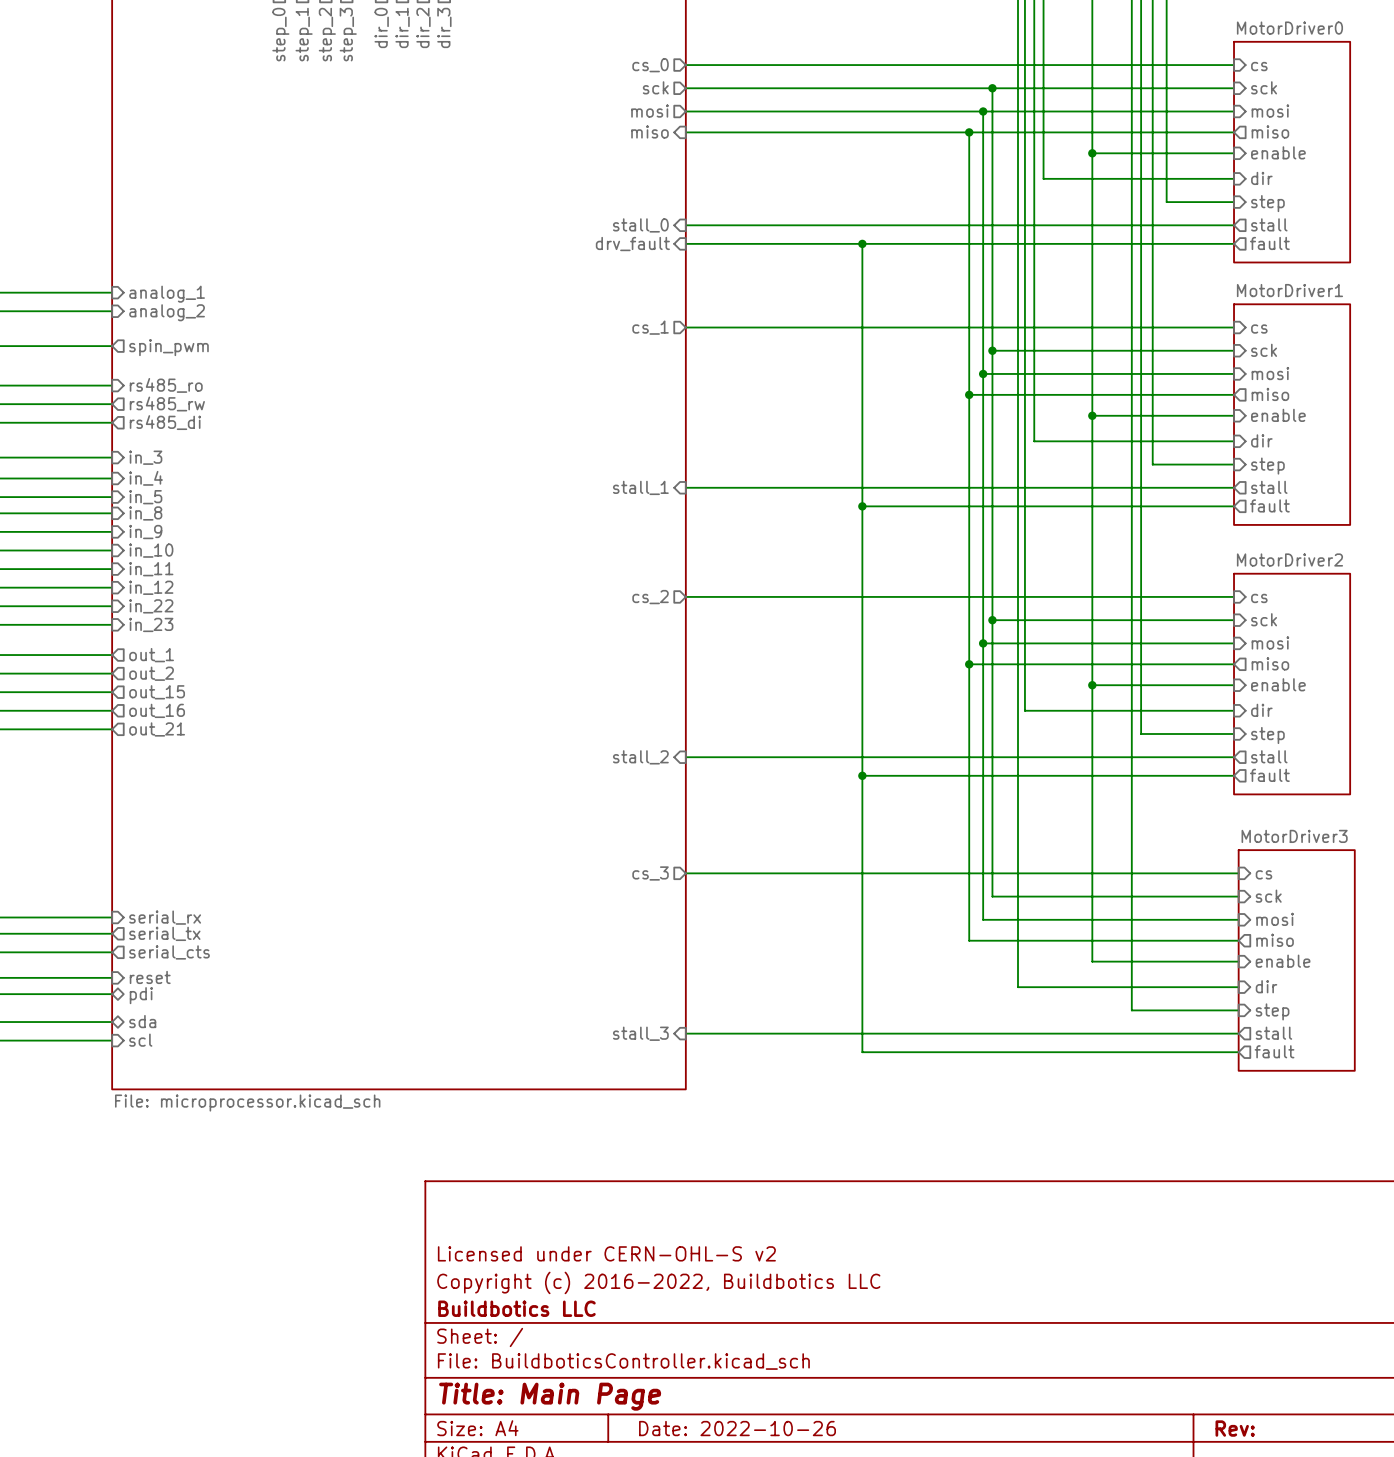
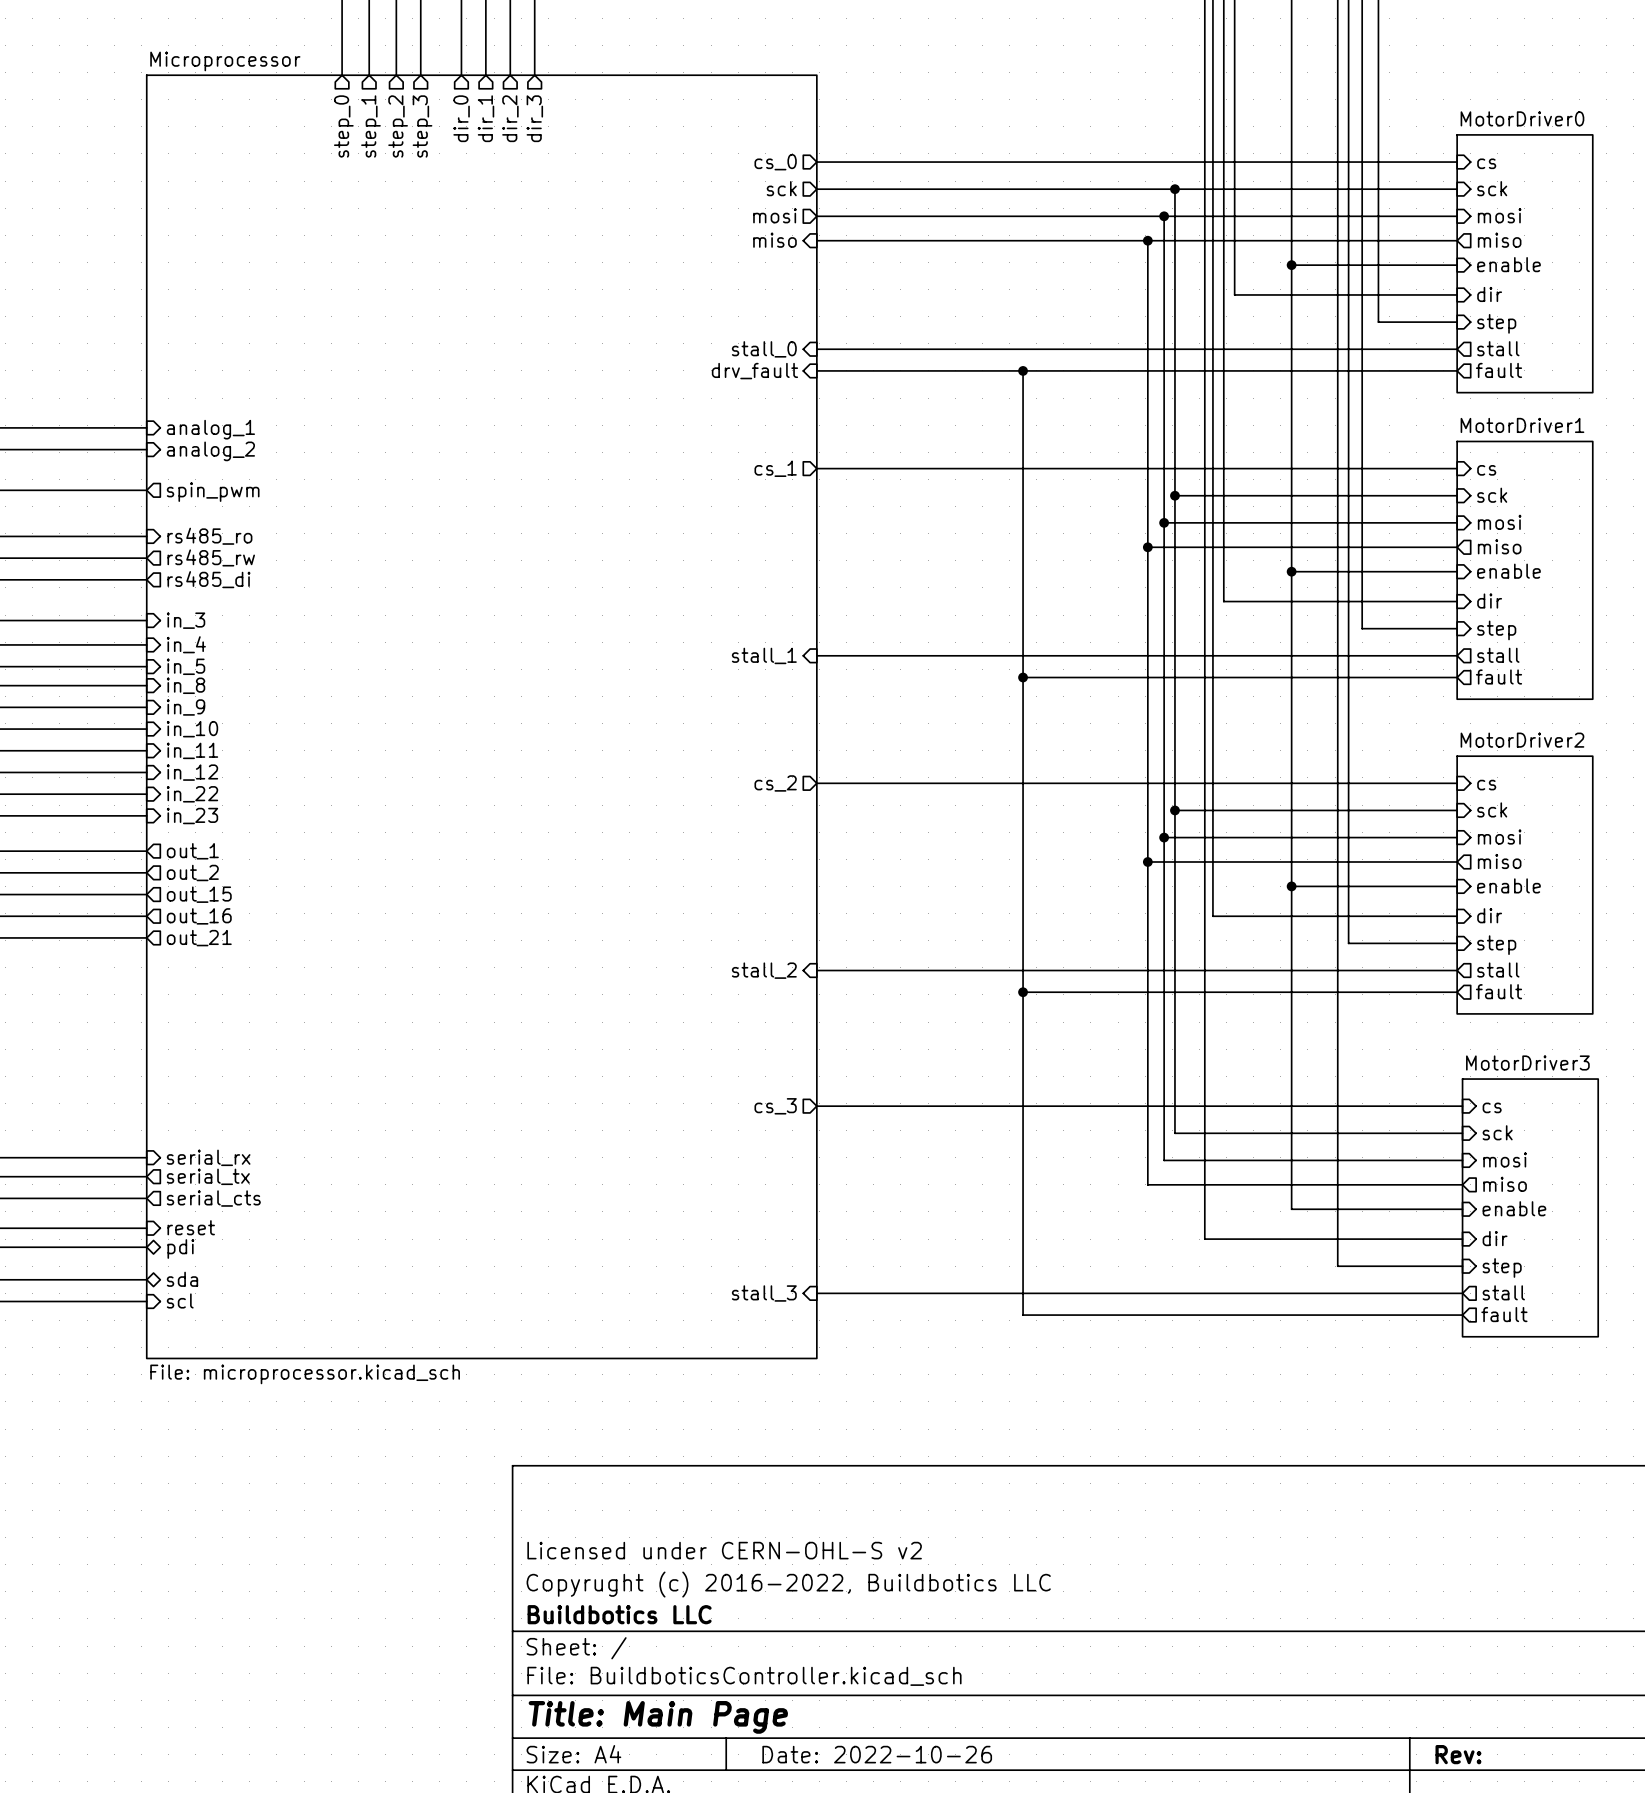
title block: Copyright (c) 2016-2022, Buildbotics LLC (658, 1282) -> Copyrught (c) 2016-2022, Buildbotics LLC (788, 1584)

